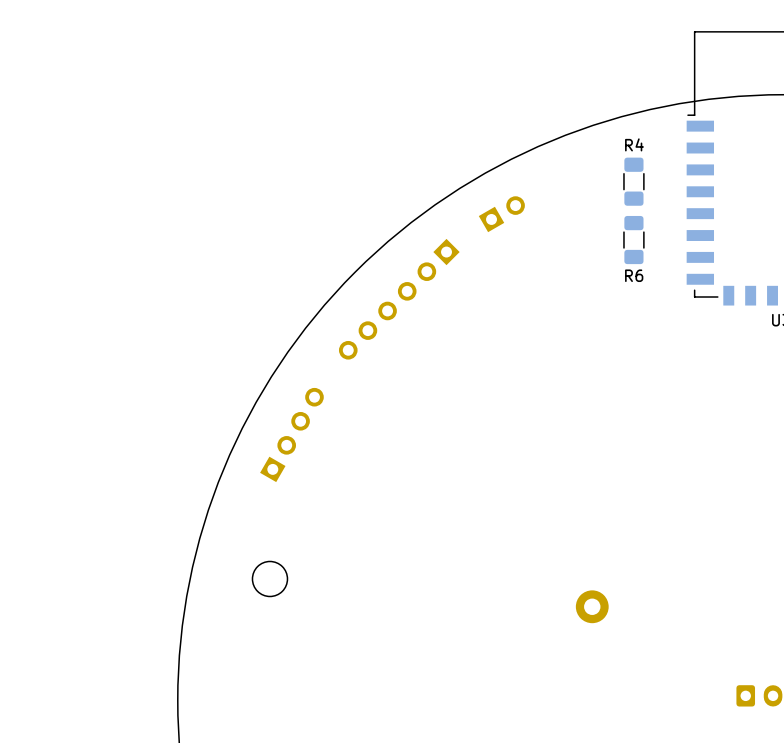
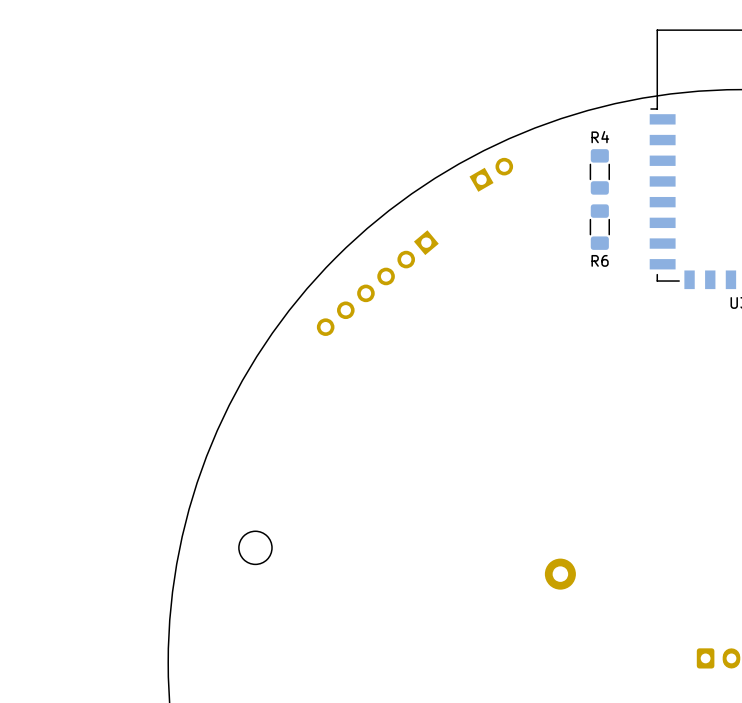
part position: (501, 214) -> (491, 174)
part rotation: 0° (399, 299) -> 5° clockwise (377, 283)
part: (291, 435) -> none

